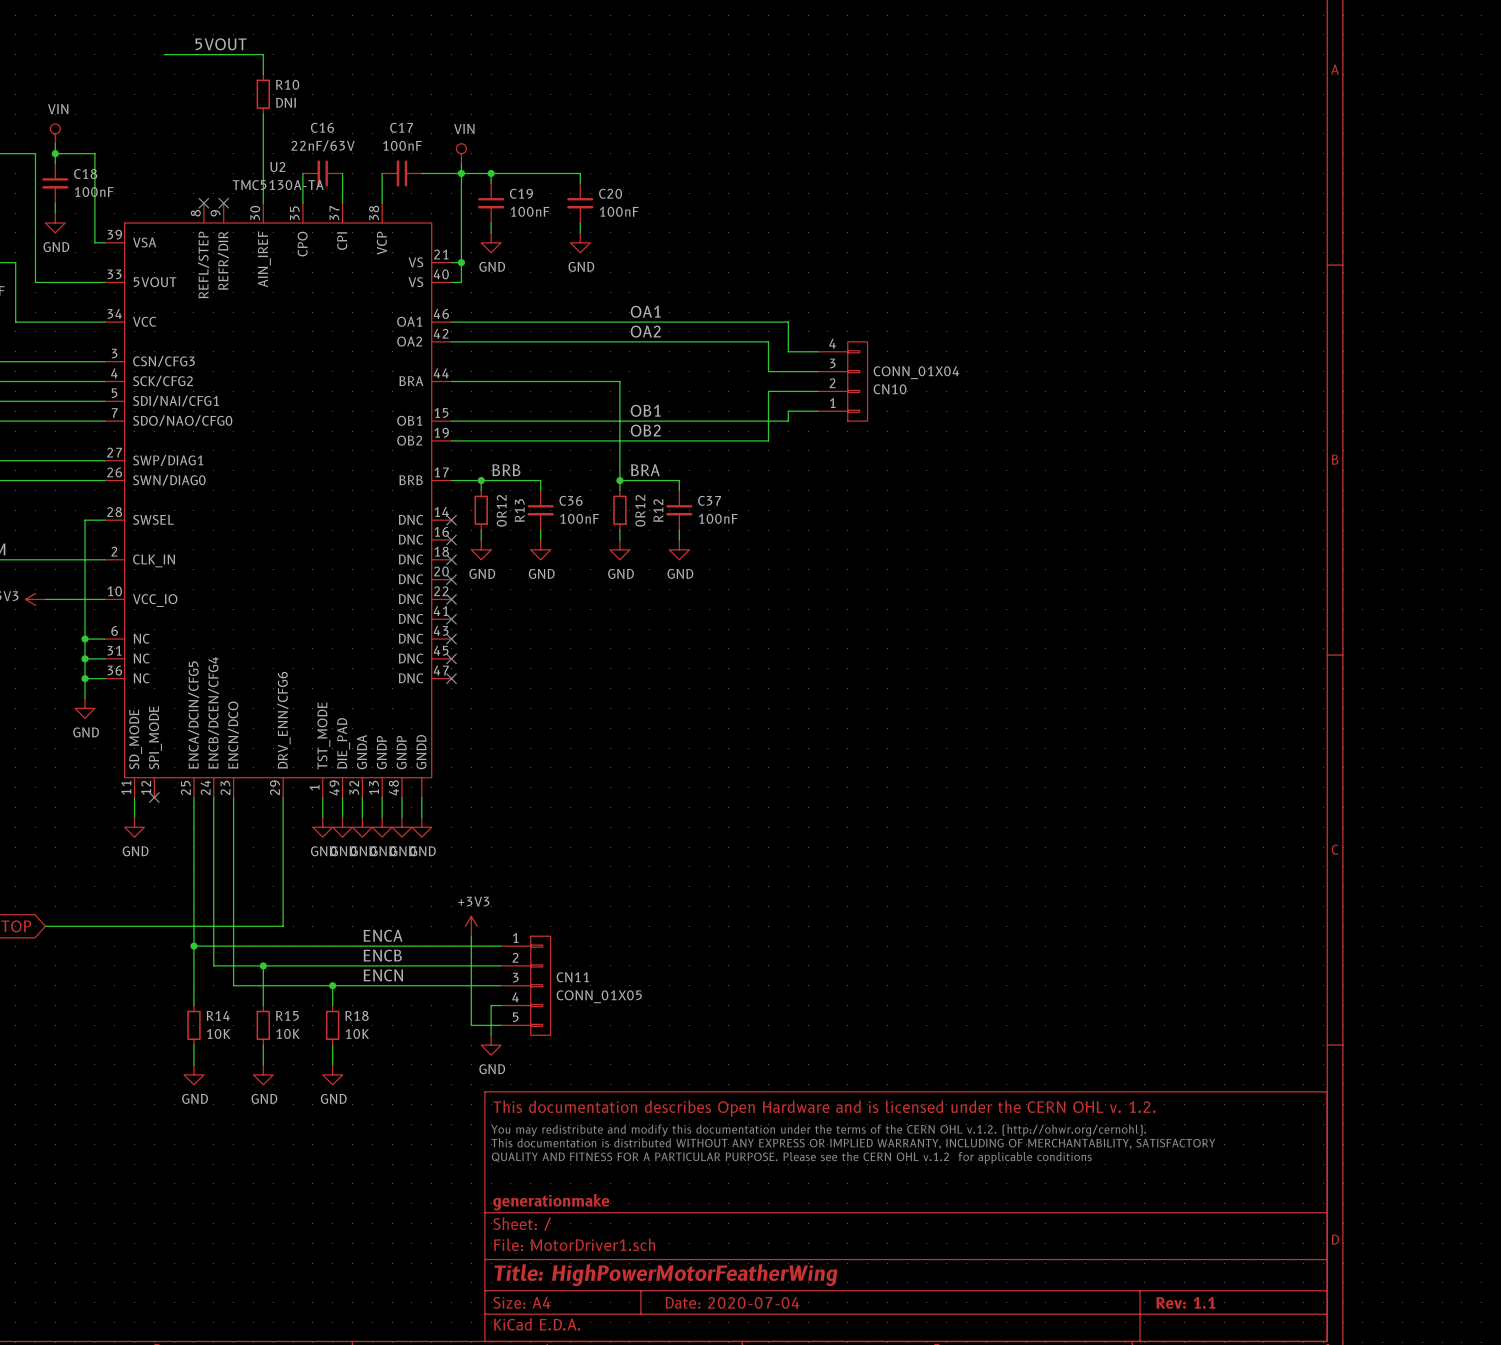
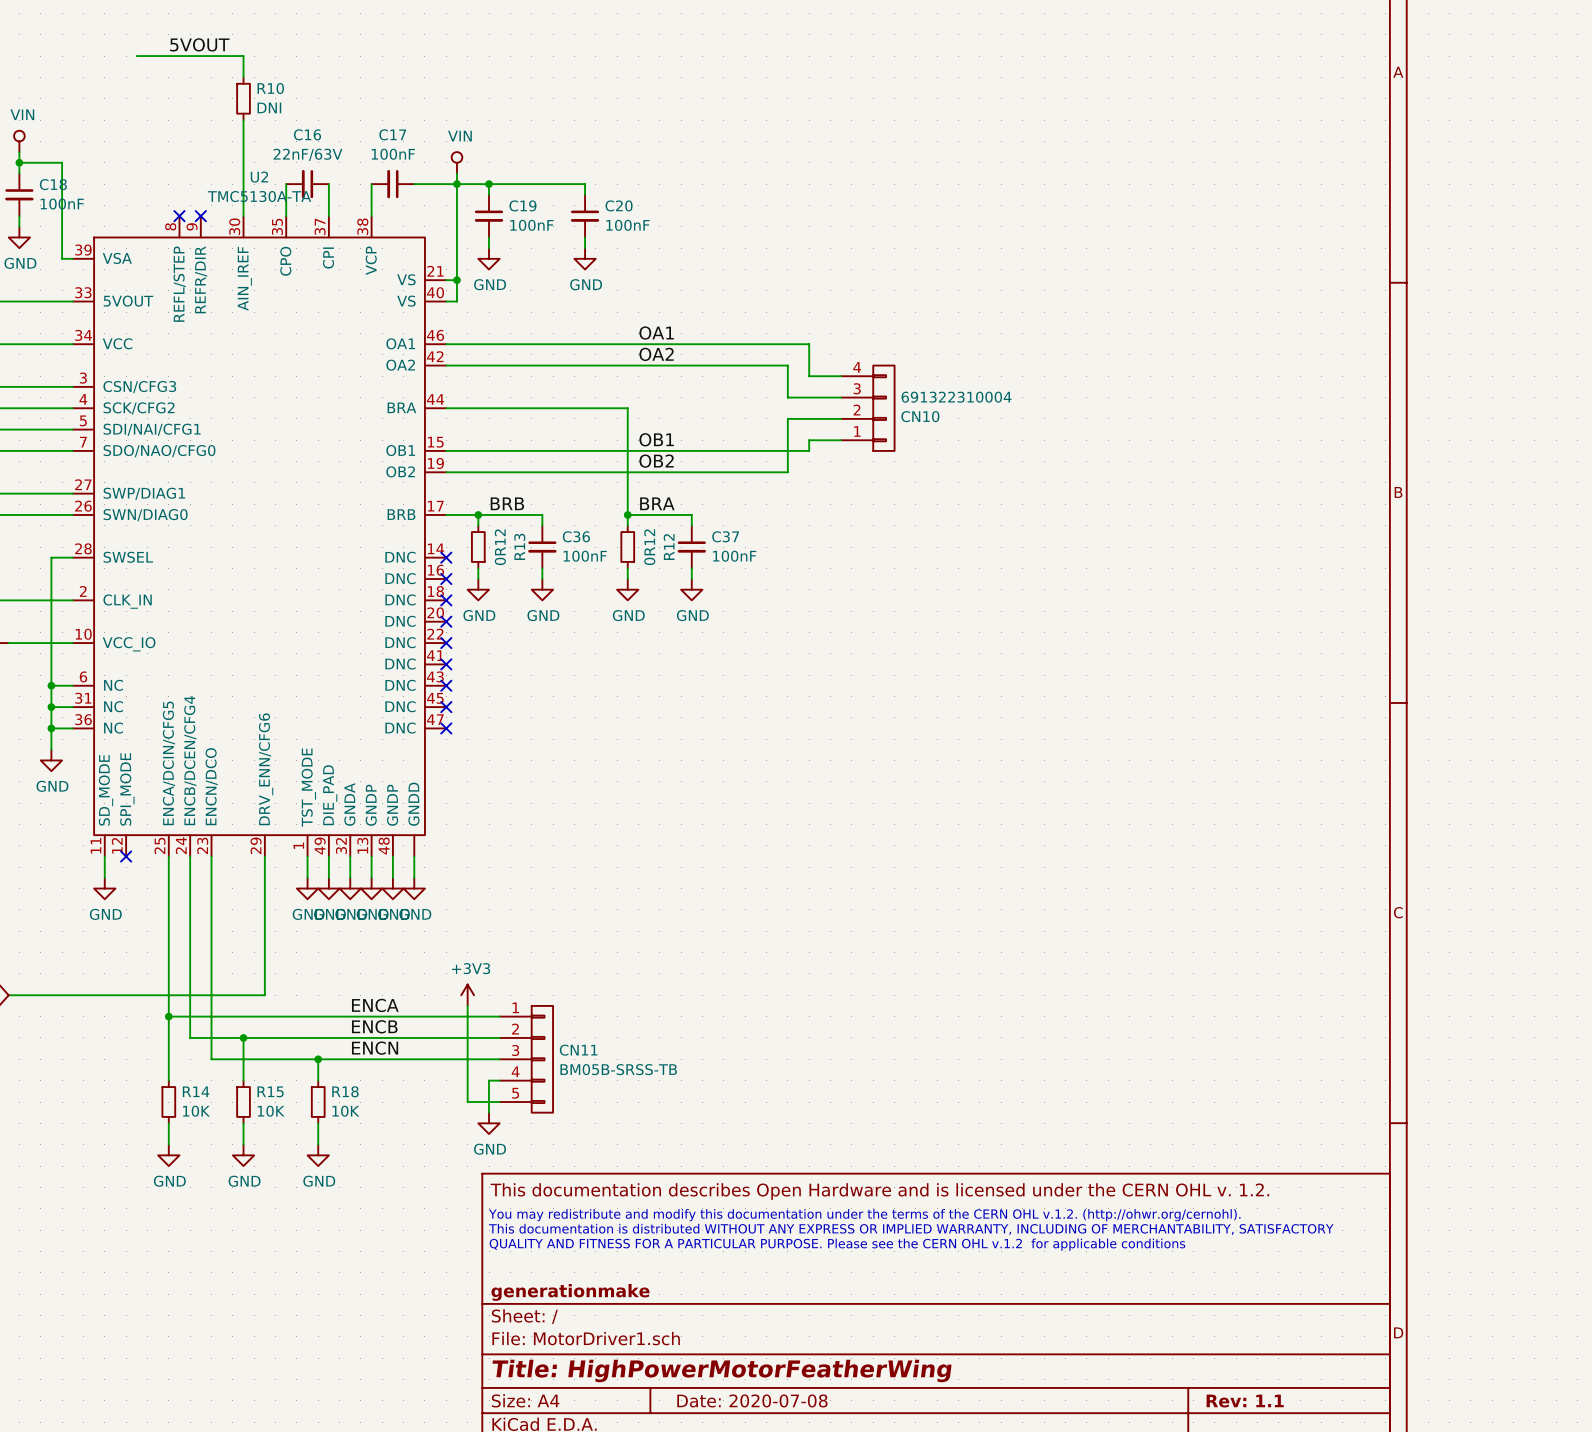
CN10 value: CONN_01X04 (916, 372) -> 691322310004 (956, 397)
CN11 value: CONN_01X05 (599, 996) -> BM05B-SRSS-TB (618, 1069)
title block: Date: 2020-07-04 (732, 1302) -> Date: 2020-07-08 (752, 1400)

